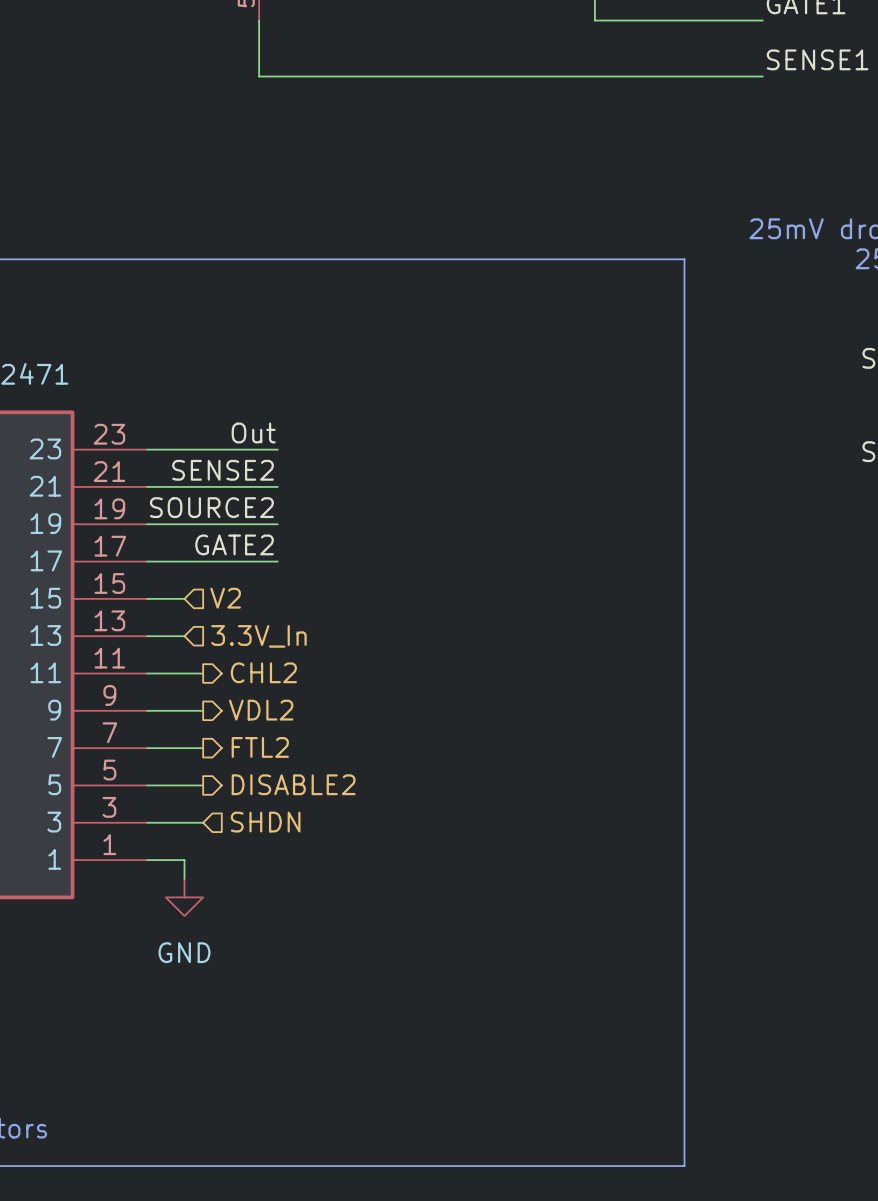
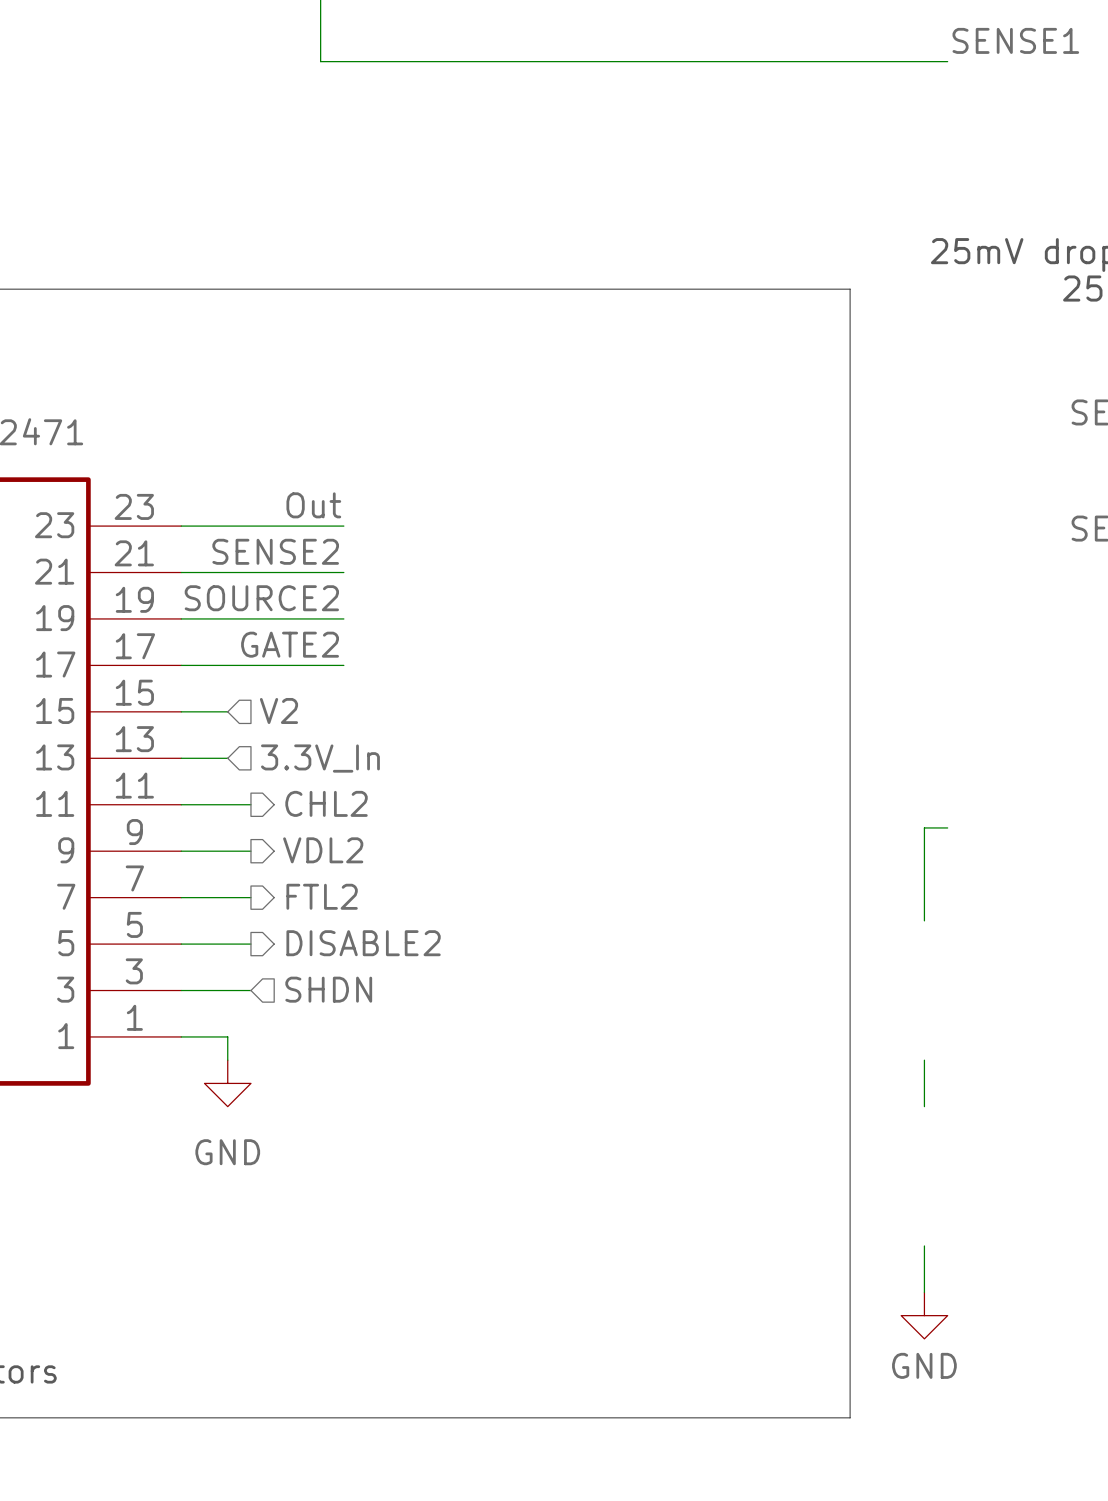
wire: none -> (947, 827) (924, 827) (924, 920)
wire: none -> (924, 1060) (924, 1106)
wire: none -> (924, 1245) (924, 1292)
power symbol: none -> GND (924, 1315)

